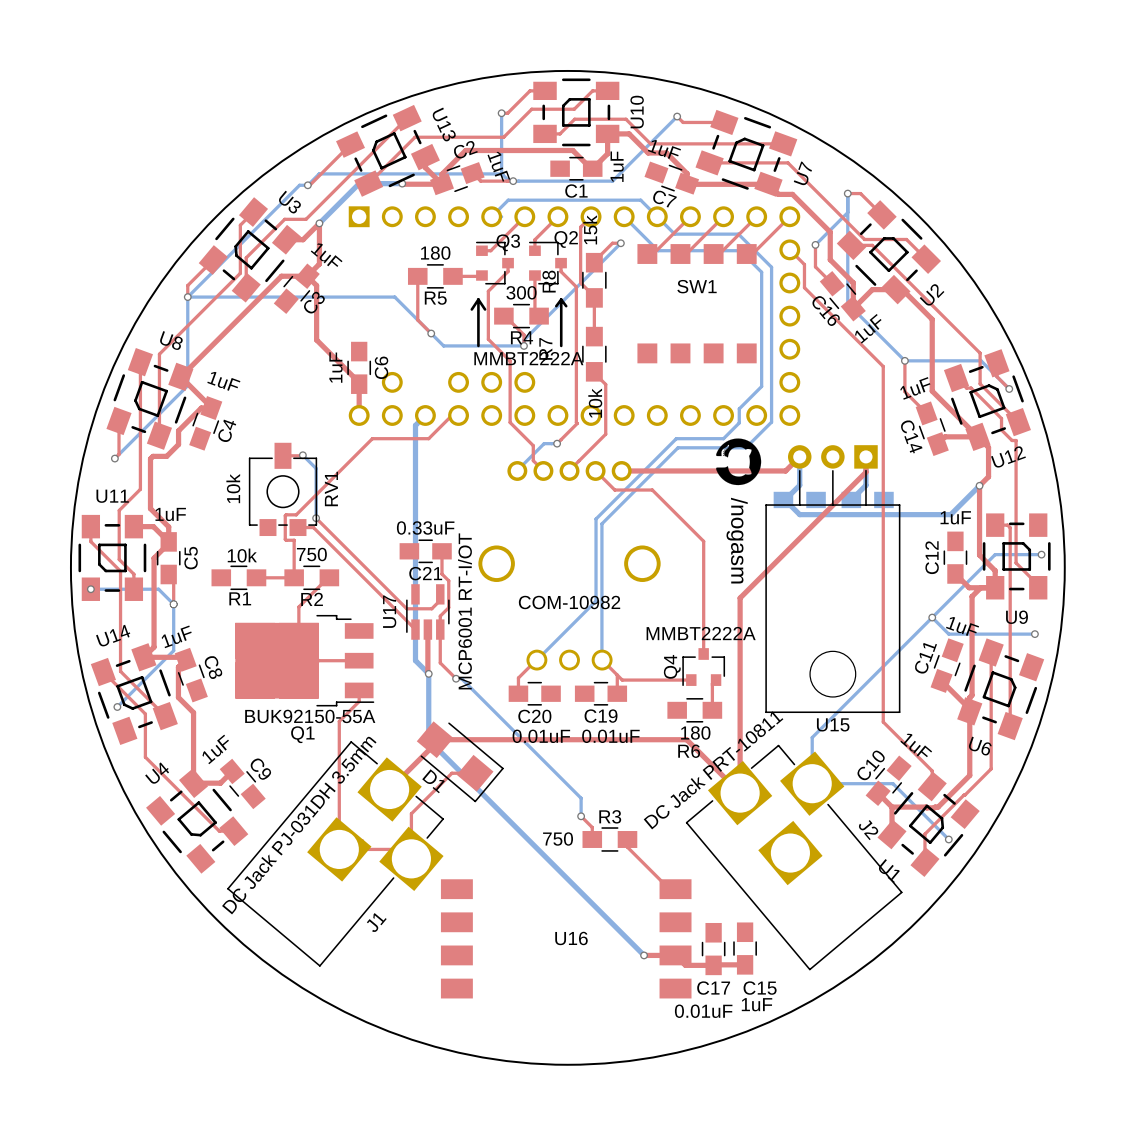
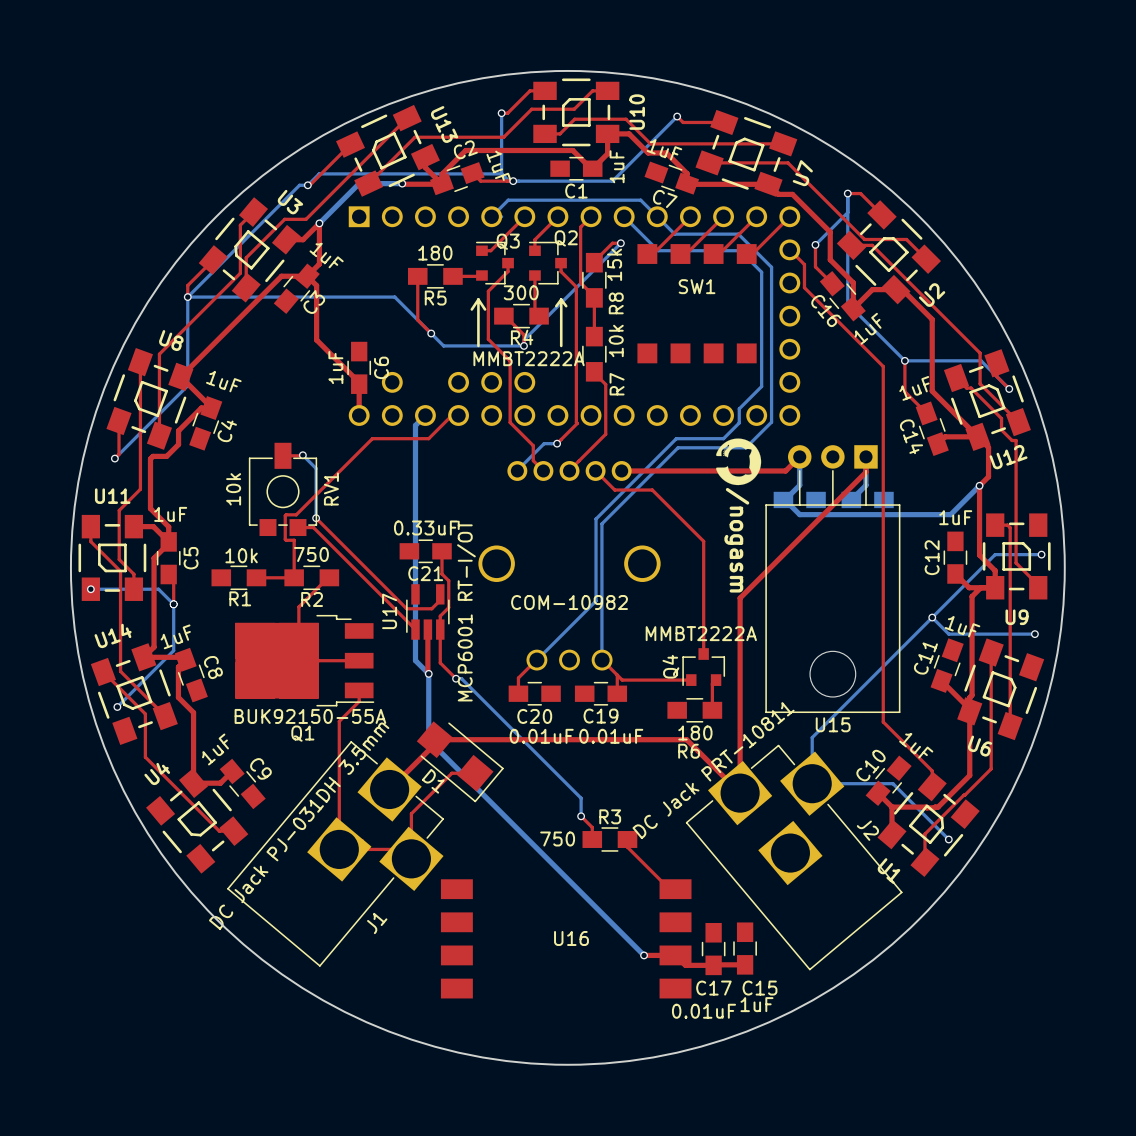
R8 value position: 15k (590, 229) -> 15k (614, 264)
R8 name position: R8 (549, 281) -> R8 (616, 303)
R7 name position: R7 (545, 348) -> R7 (617, 384)
R7 value position: 10k (595, 403) -> 10k (616, 340)

